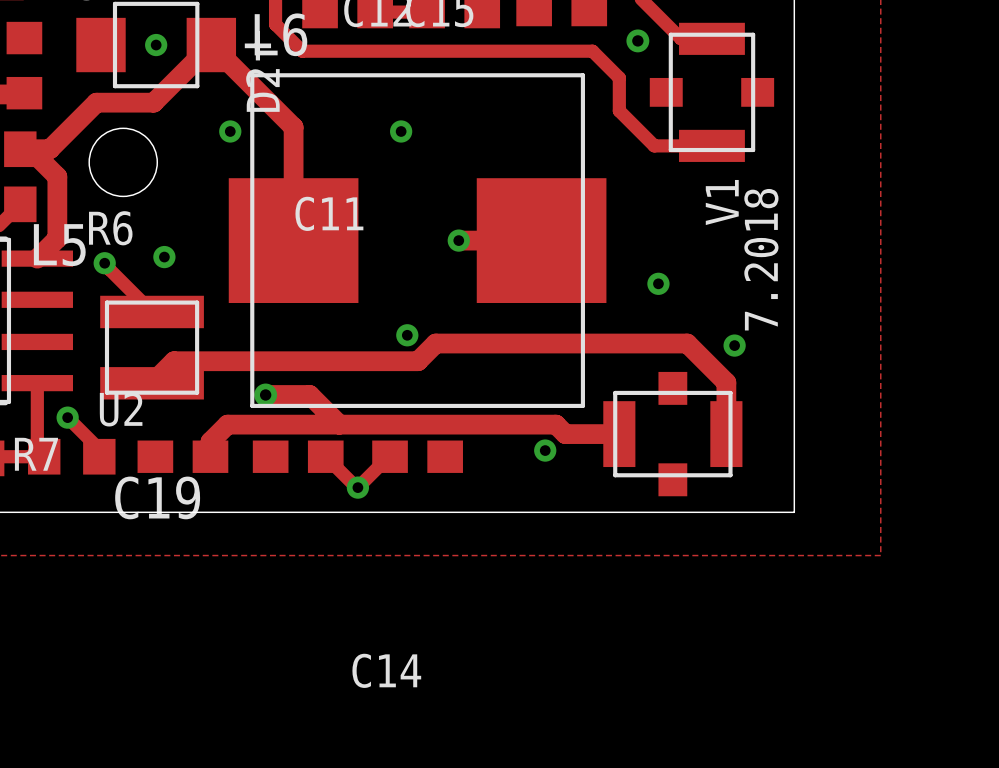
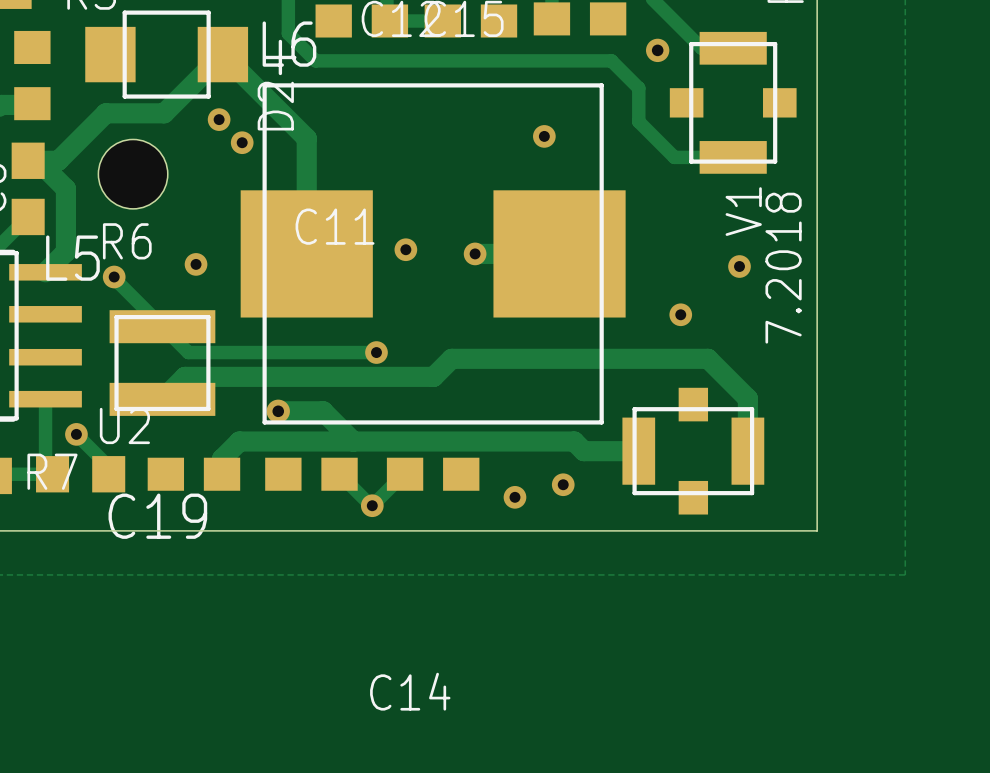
via: (156, 45) -> none
via: none -> (219, 119)
via: none -> (544, 136)
via: (401, 131) -> none
via: none -> (405, 249)
via: none -> (739, 266)
via position: (164, 257) -> (196, 264)
via position: (658, 283) -> (680, 314)
track: none -> (162, 326) (188, 352) (376, 352)
via position: (407, 335) -> (376, 352)
via: (734, 345) -> none
via position: (545, 450) -> (563, 484)
via: none -> (514, 497)

